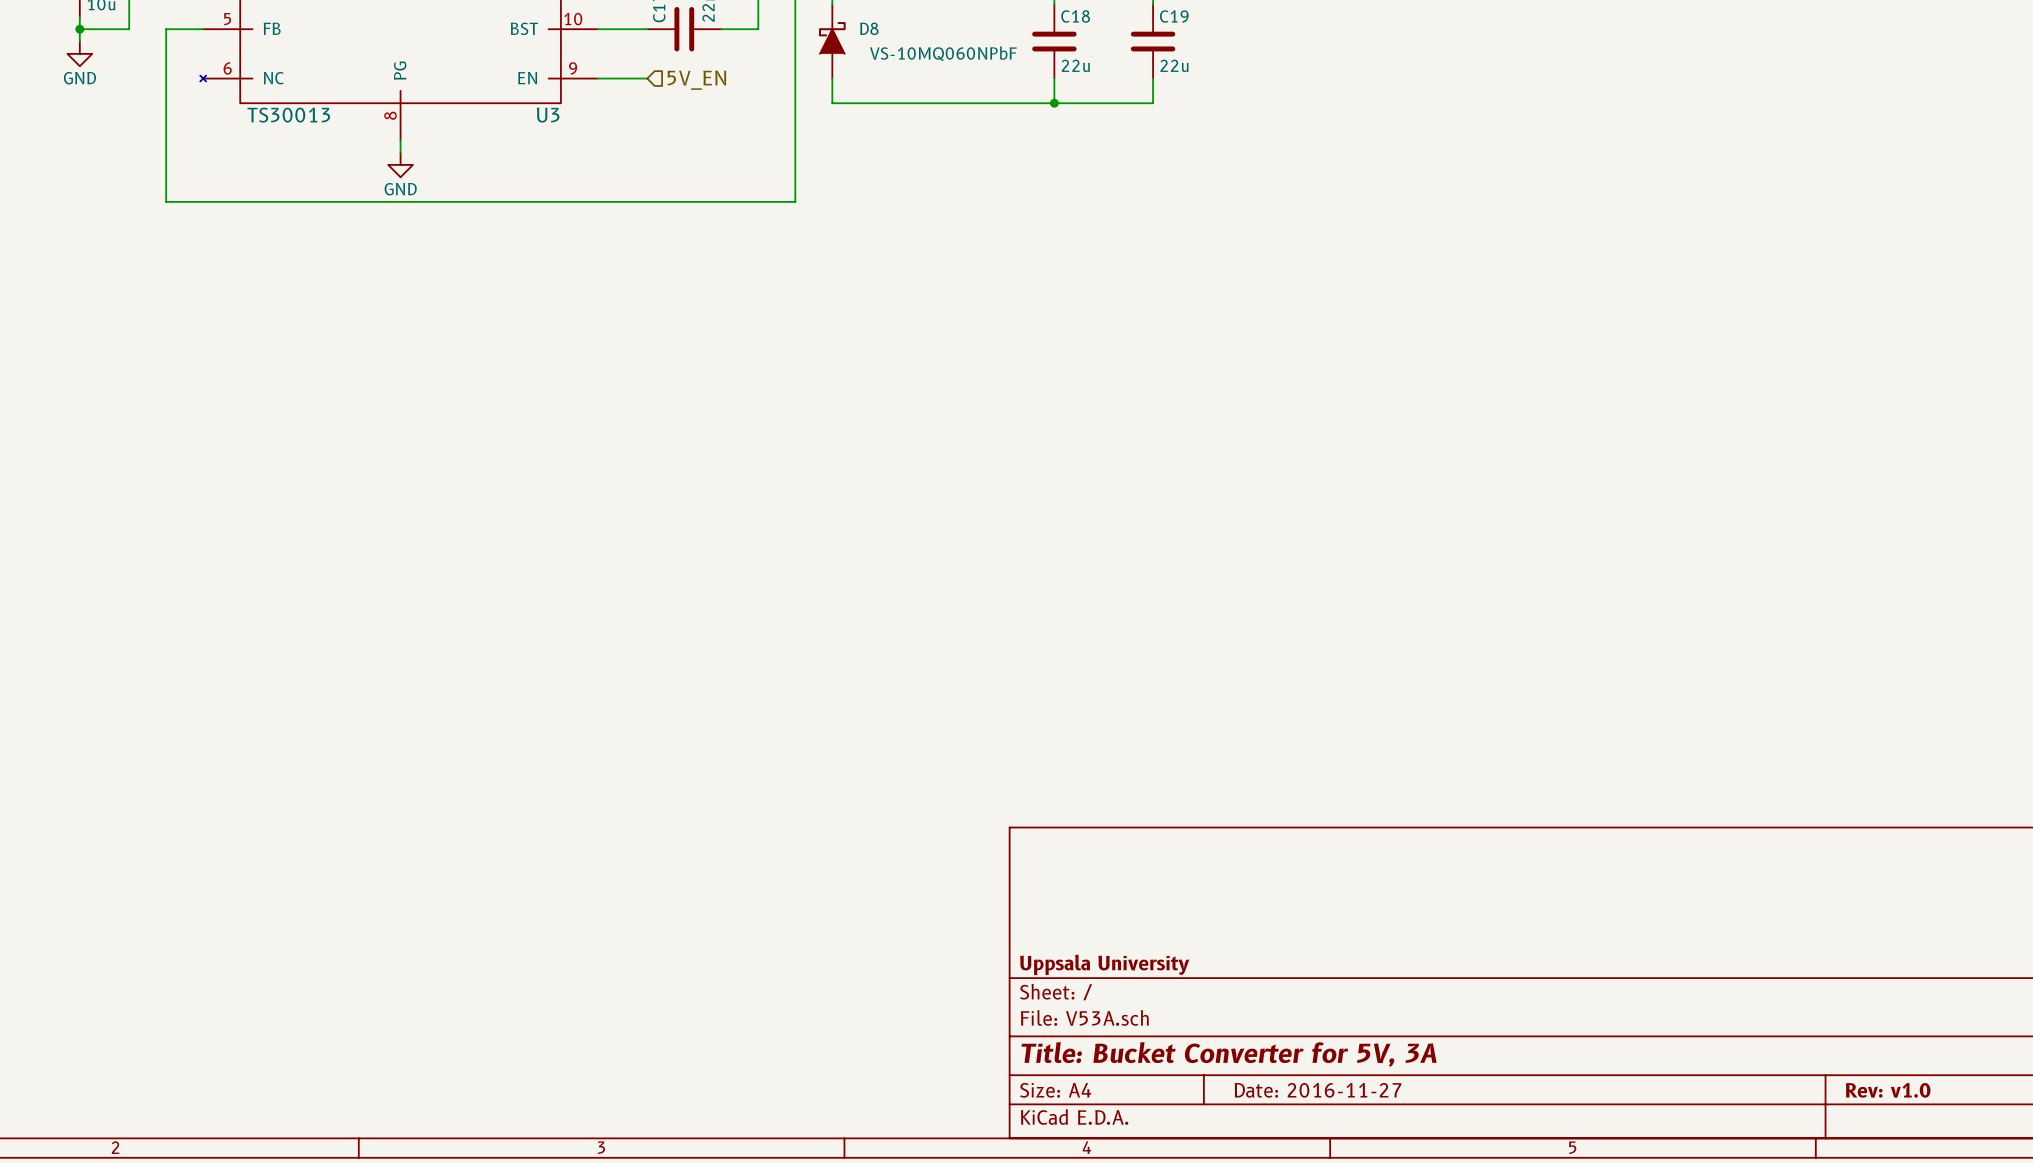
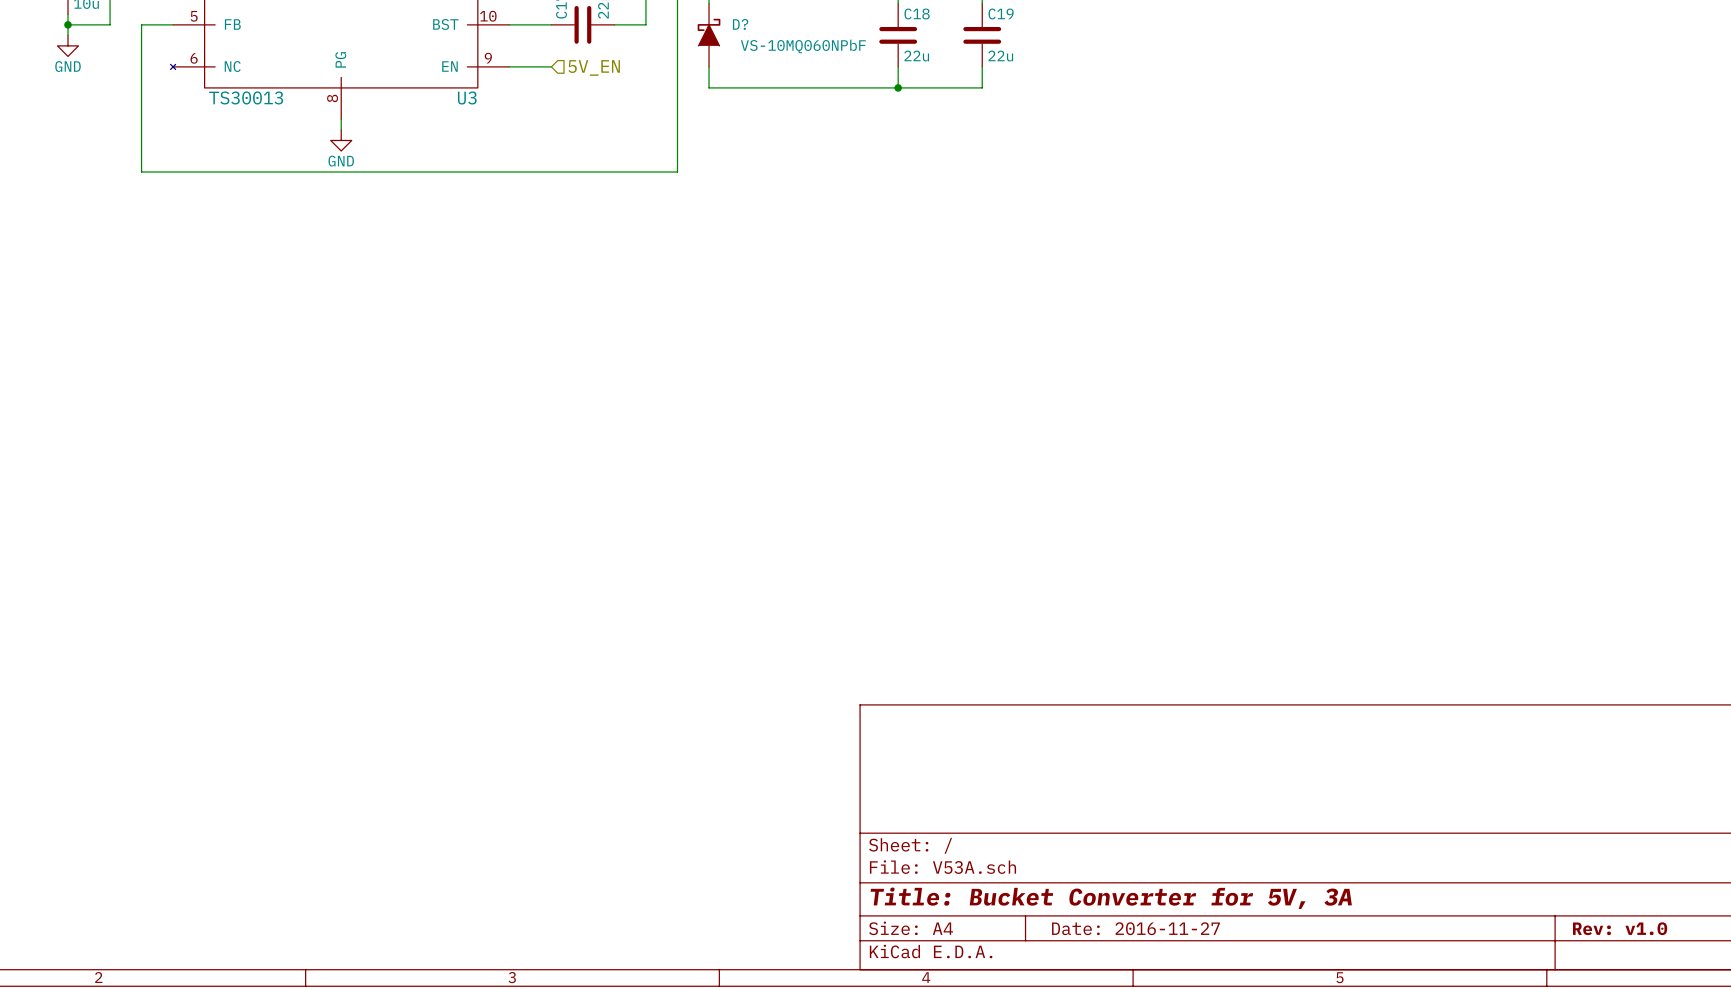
D8 name: D8 (869, 28) -> D? (740, 24)
title block: Uppsala University (1104, 964) -> none

